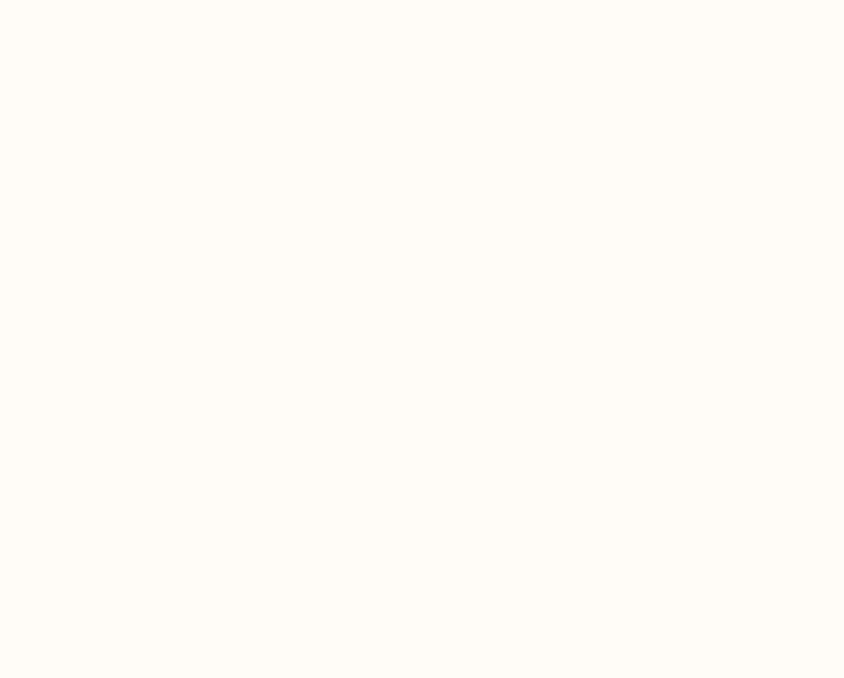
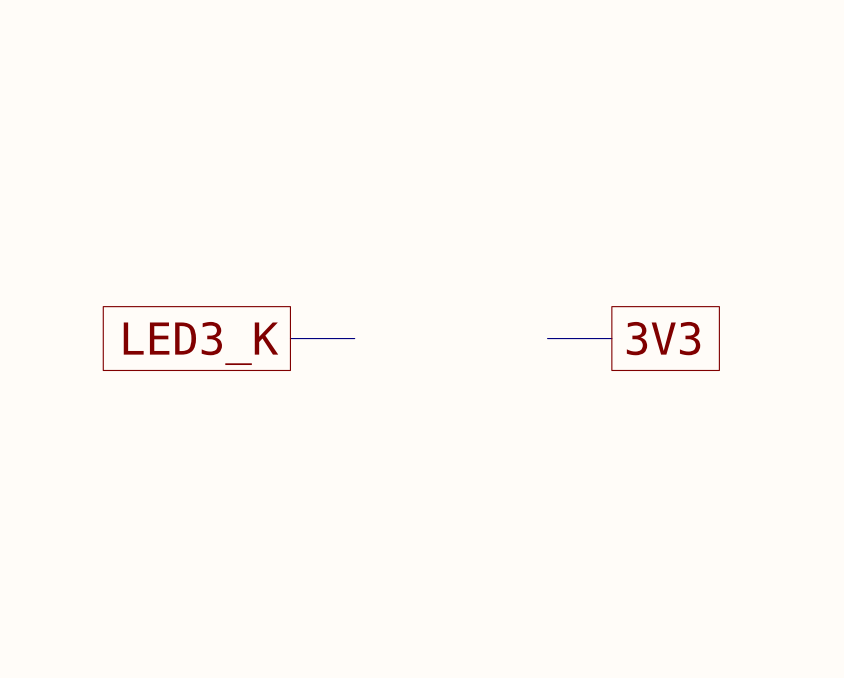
wire: none -> (290, 338) (354, 338)
wire: none -> (547, 338) (611, 338)
global label: none -> 3V3 (663, 338)
global label: none -> LED3_K (200, 343)

